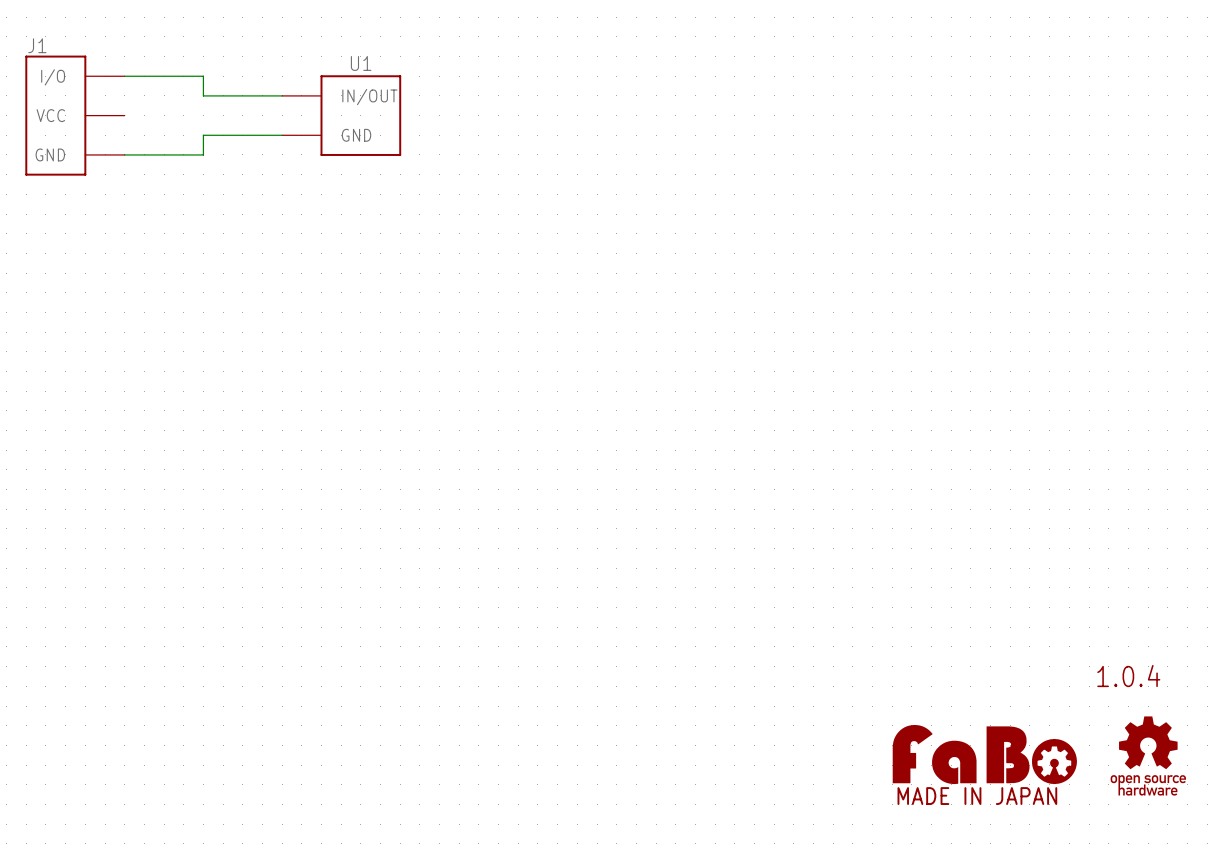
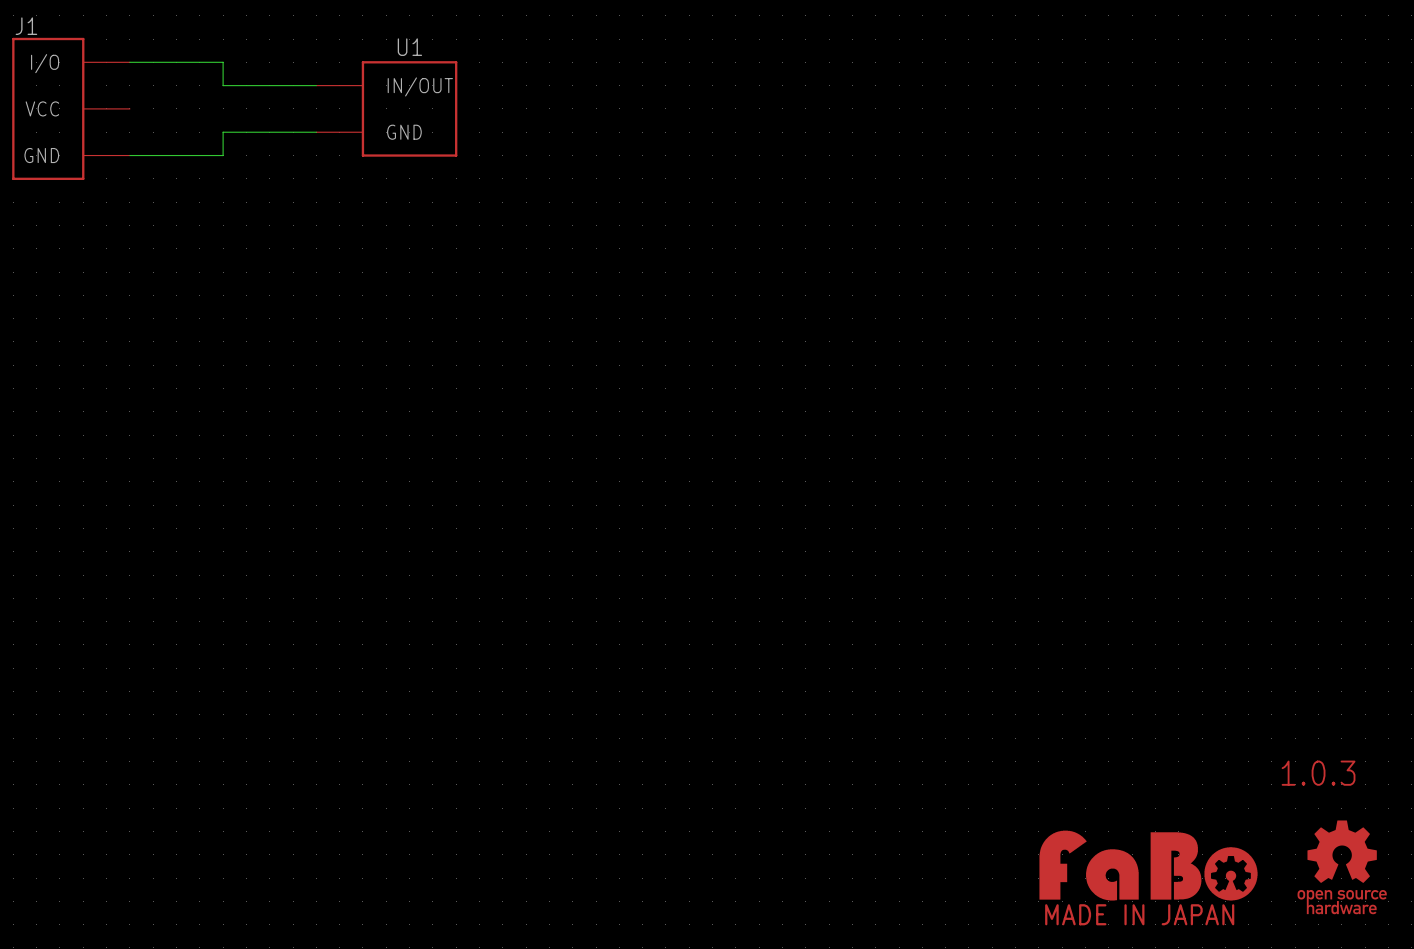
text: 1.0.4 (1128, 676) -> 1.0.3 (1318, 773)

